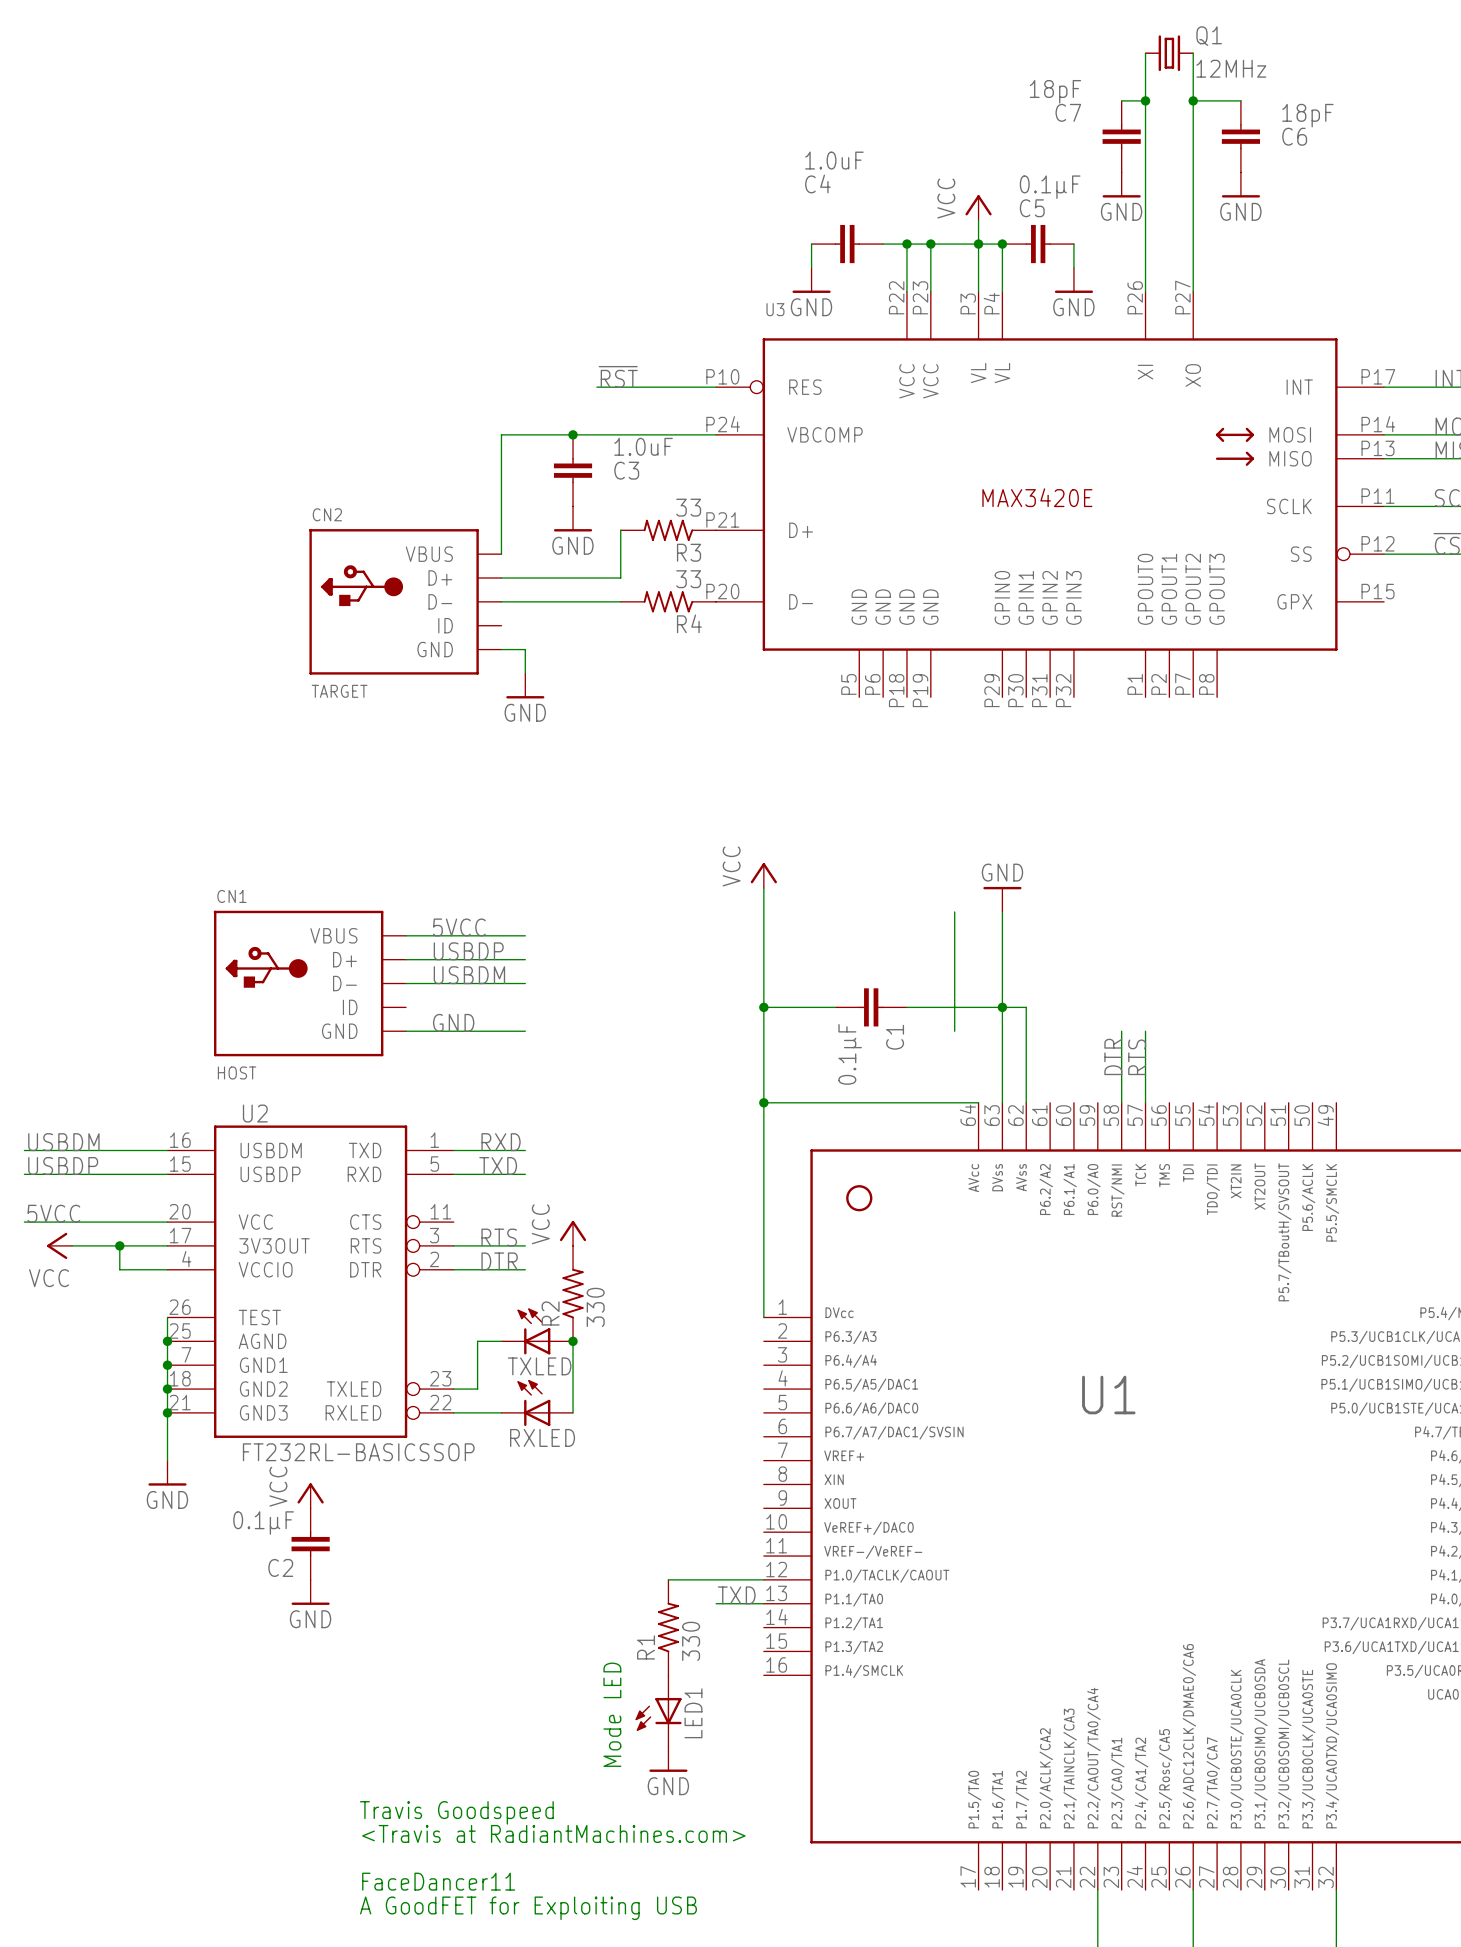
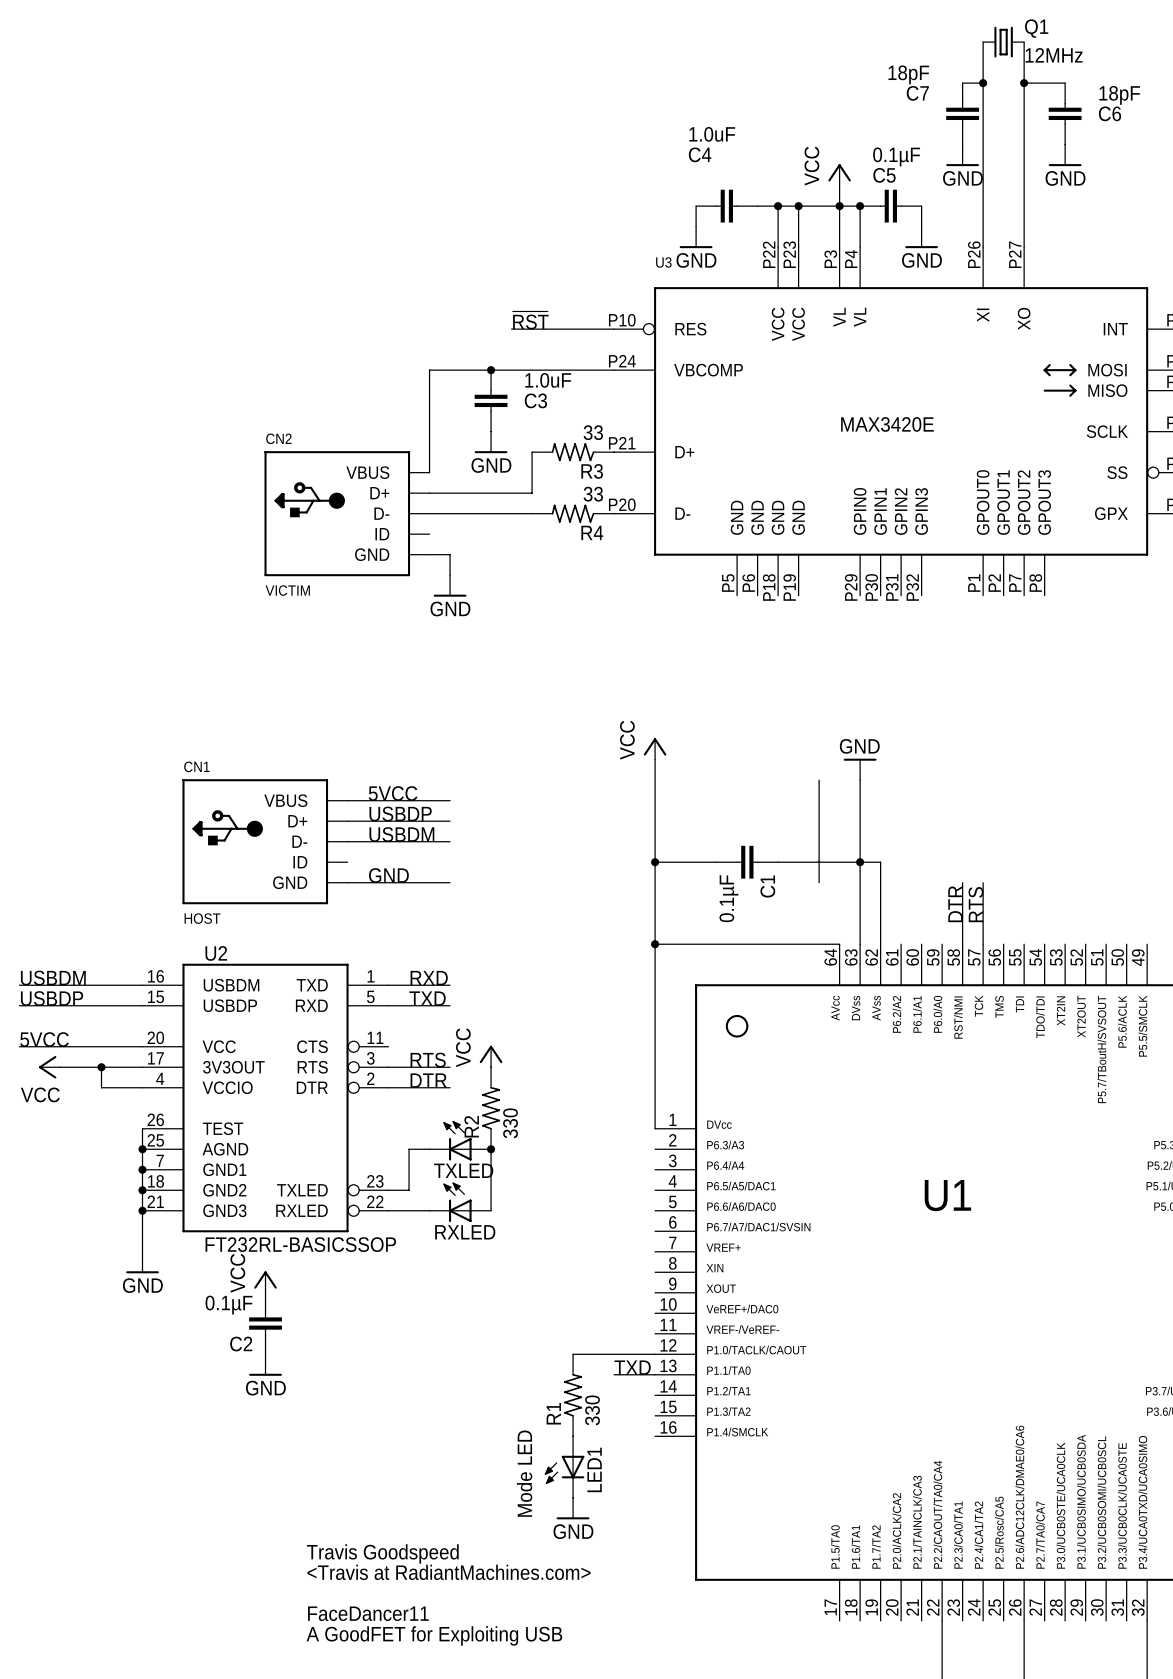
CN2 value: TARGET (339, 691) -> VICTIM (287, 590)

